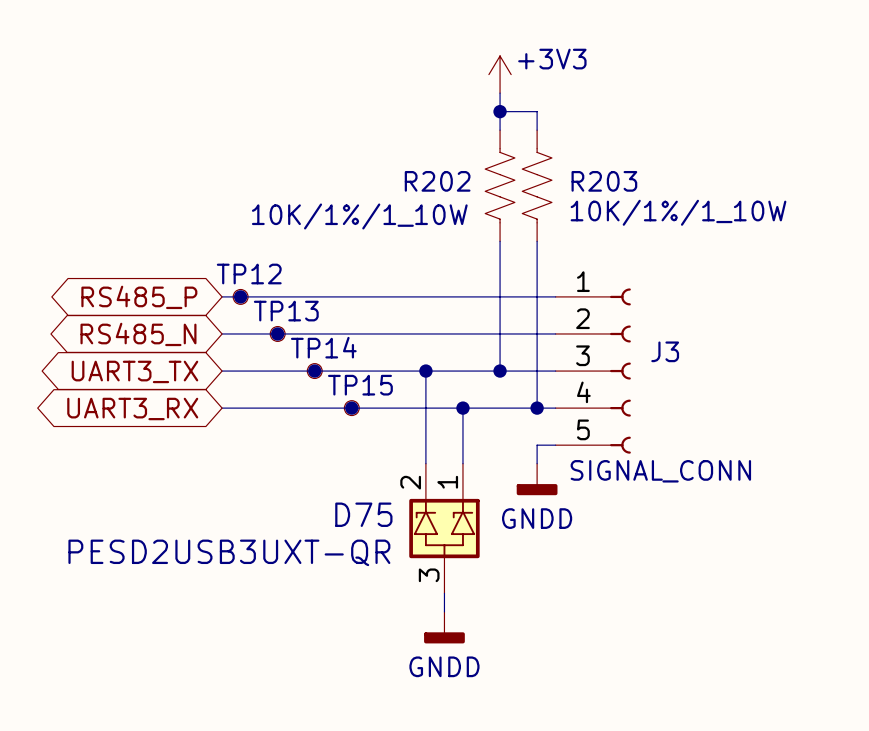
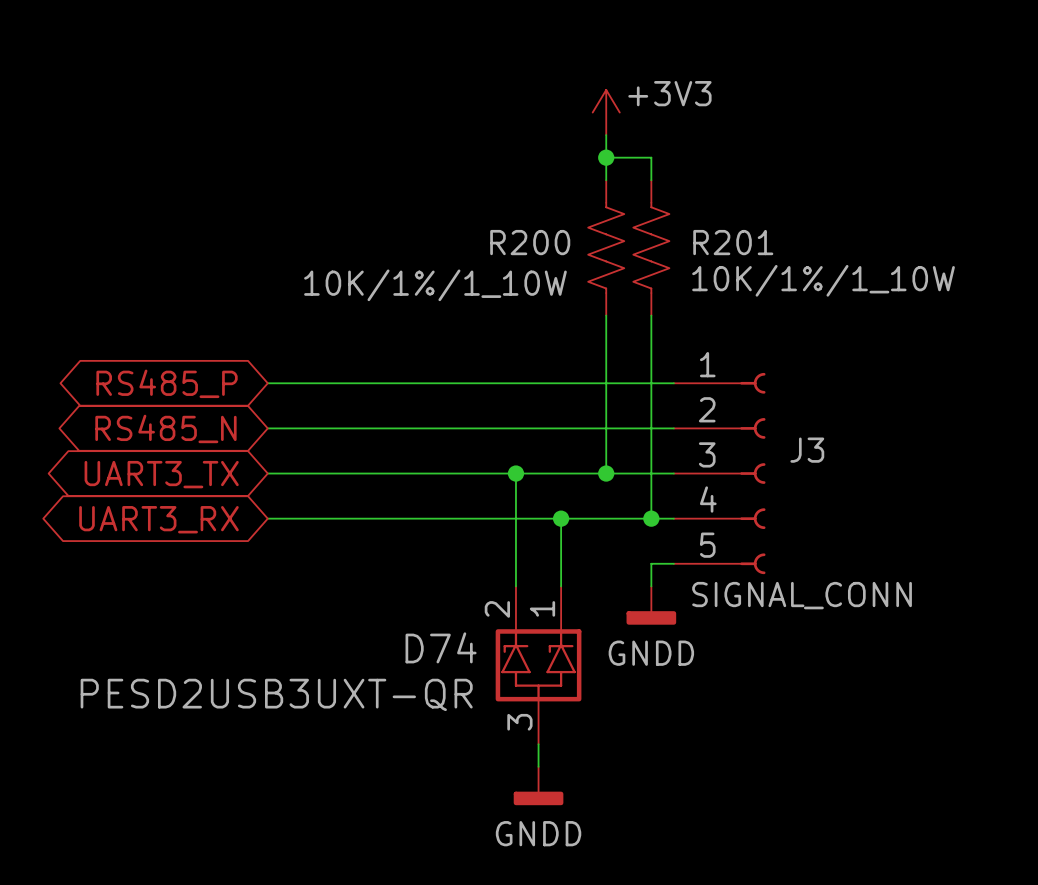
R202 name: R202 (437, 181) -> R200 (530, 242)
R203 name: R203 (604, 181) -> R201 (733, 242)
junction: (240, 296) -> none
TP12: (240, 296) -> none
junction: (277, 333) -> none
TP13: (277, 333) -> none
junction: (314, 371) -> none
TP14: (314, 371) -> none
junction: (351, 408) -> none
TP15: (351, 408) -> none
D75 name: D75 (363, 514) -> D74 (441, 647)

